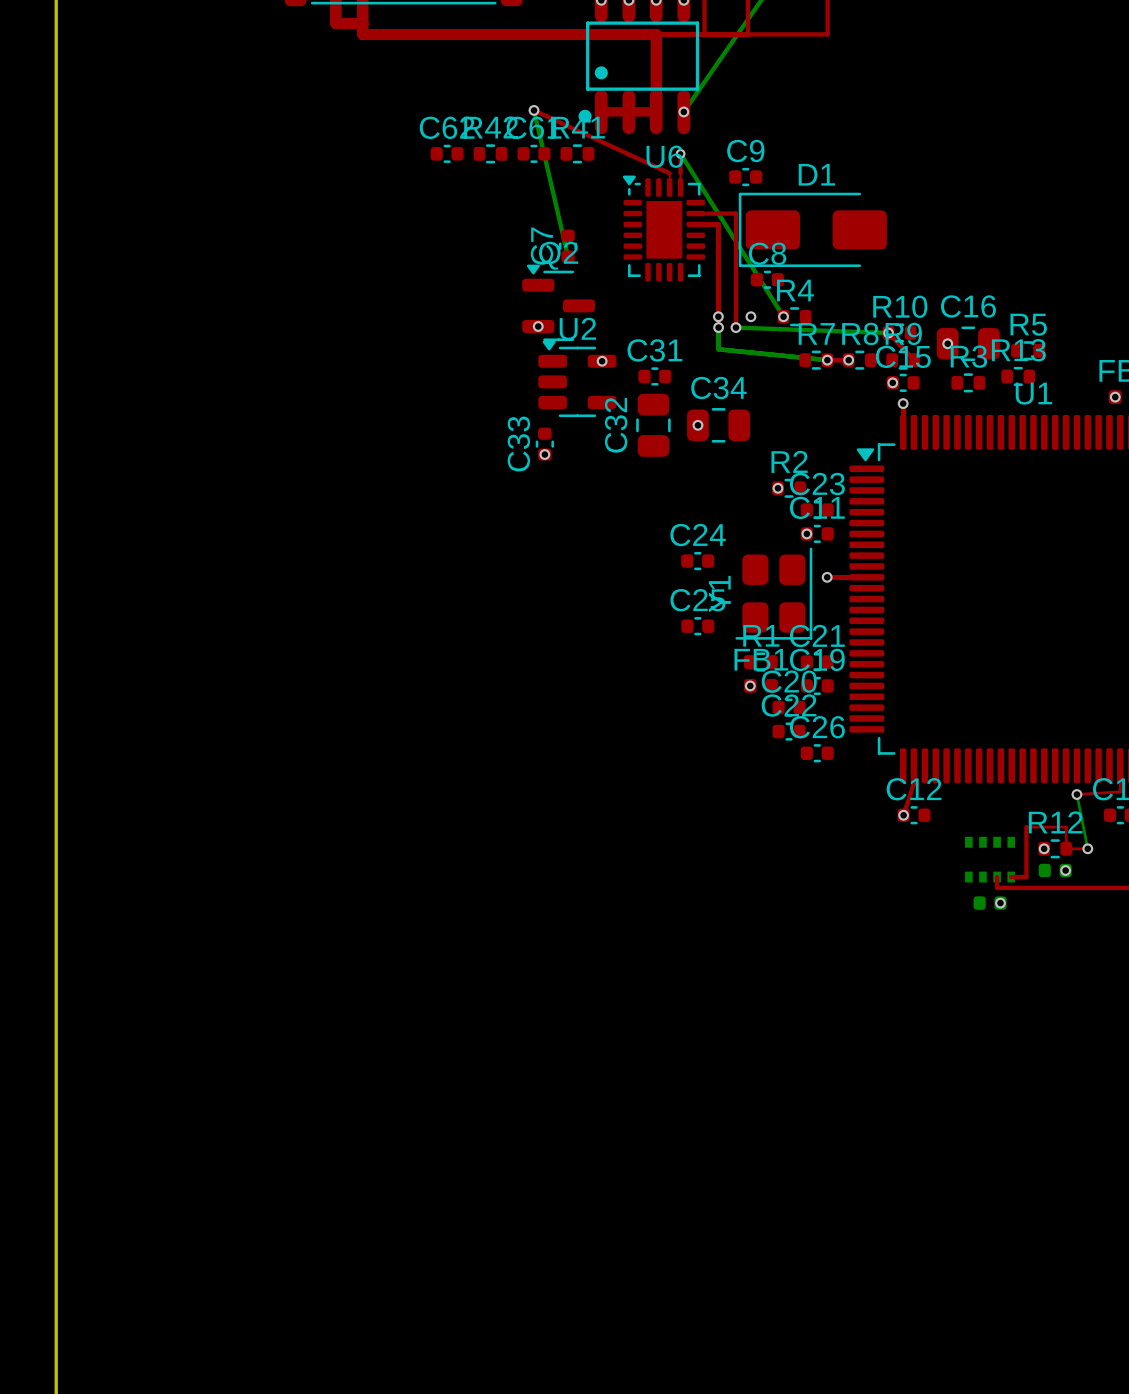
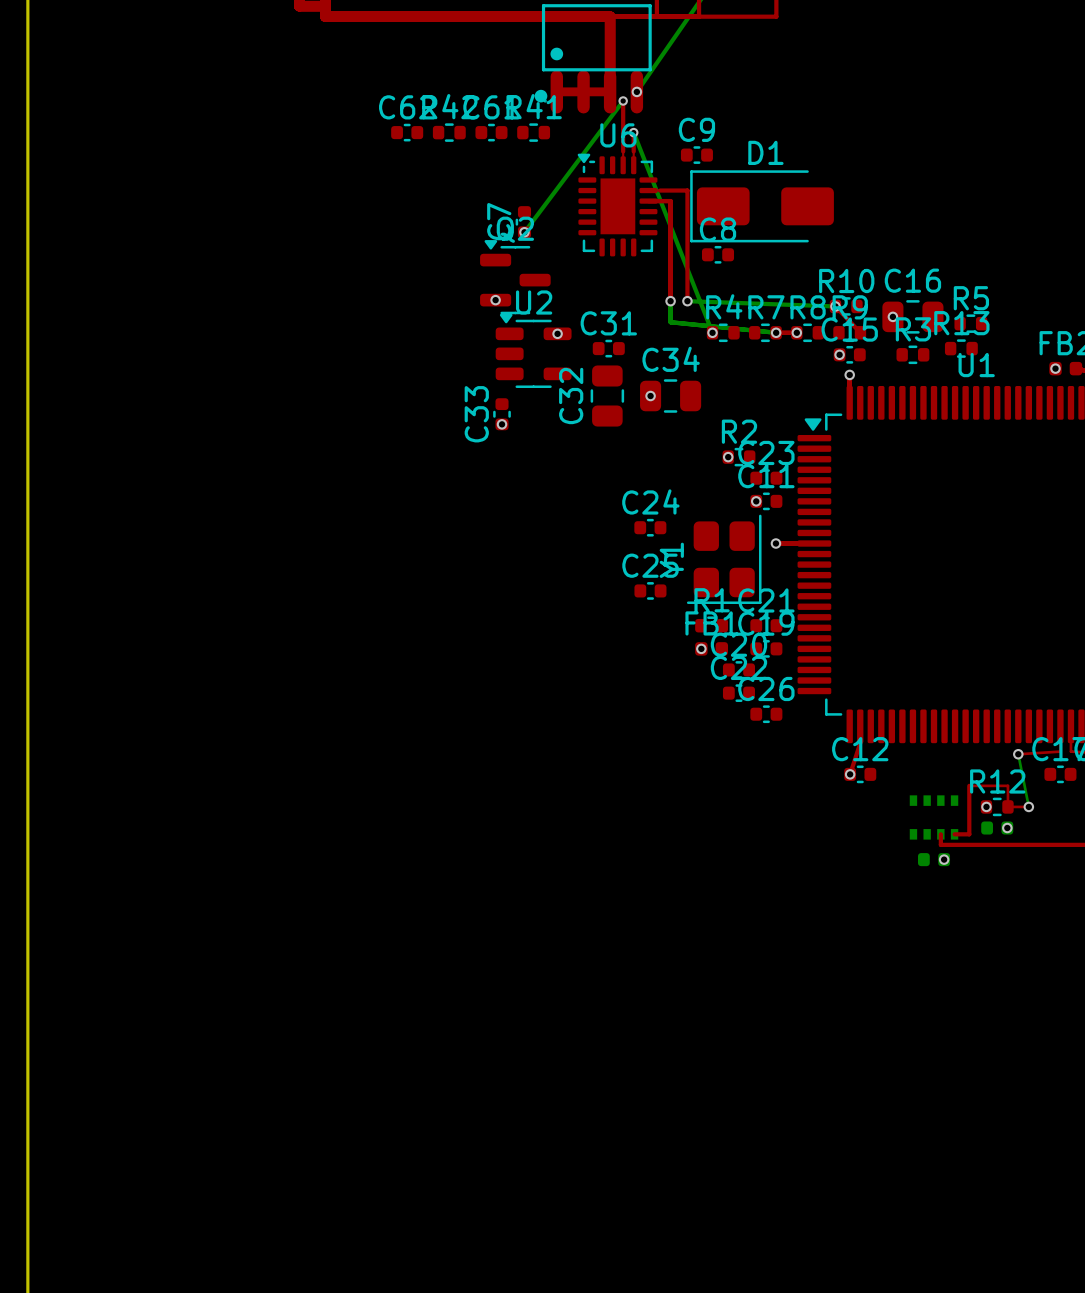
top track: (534, 110) (669, 173) -> (623, 100) (623, 151)
bottom track: (534, 110) (568, 256) -> (623, 100) (524, 232)
via: (534, 110) -> none
via: none -> (623, 100)
bottom track: (680, 153) (783, 316) -> (633, 132) (712, 332)
via: none -> (524, 232)
via: (718, 316) -> none
via: (750, 316) -> none
via: (783, 316) -> none
R4 position: (794, 316) -> (723, 332)
via: none -> (712, 332)

